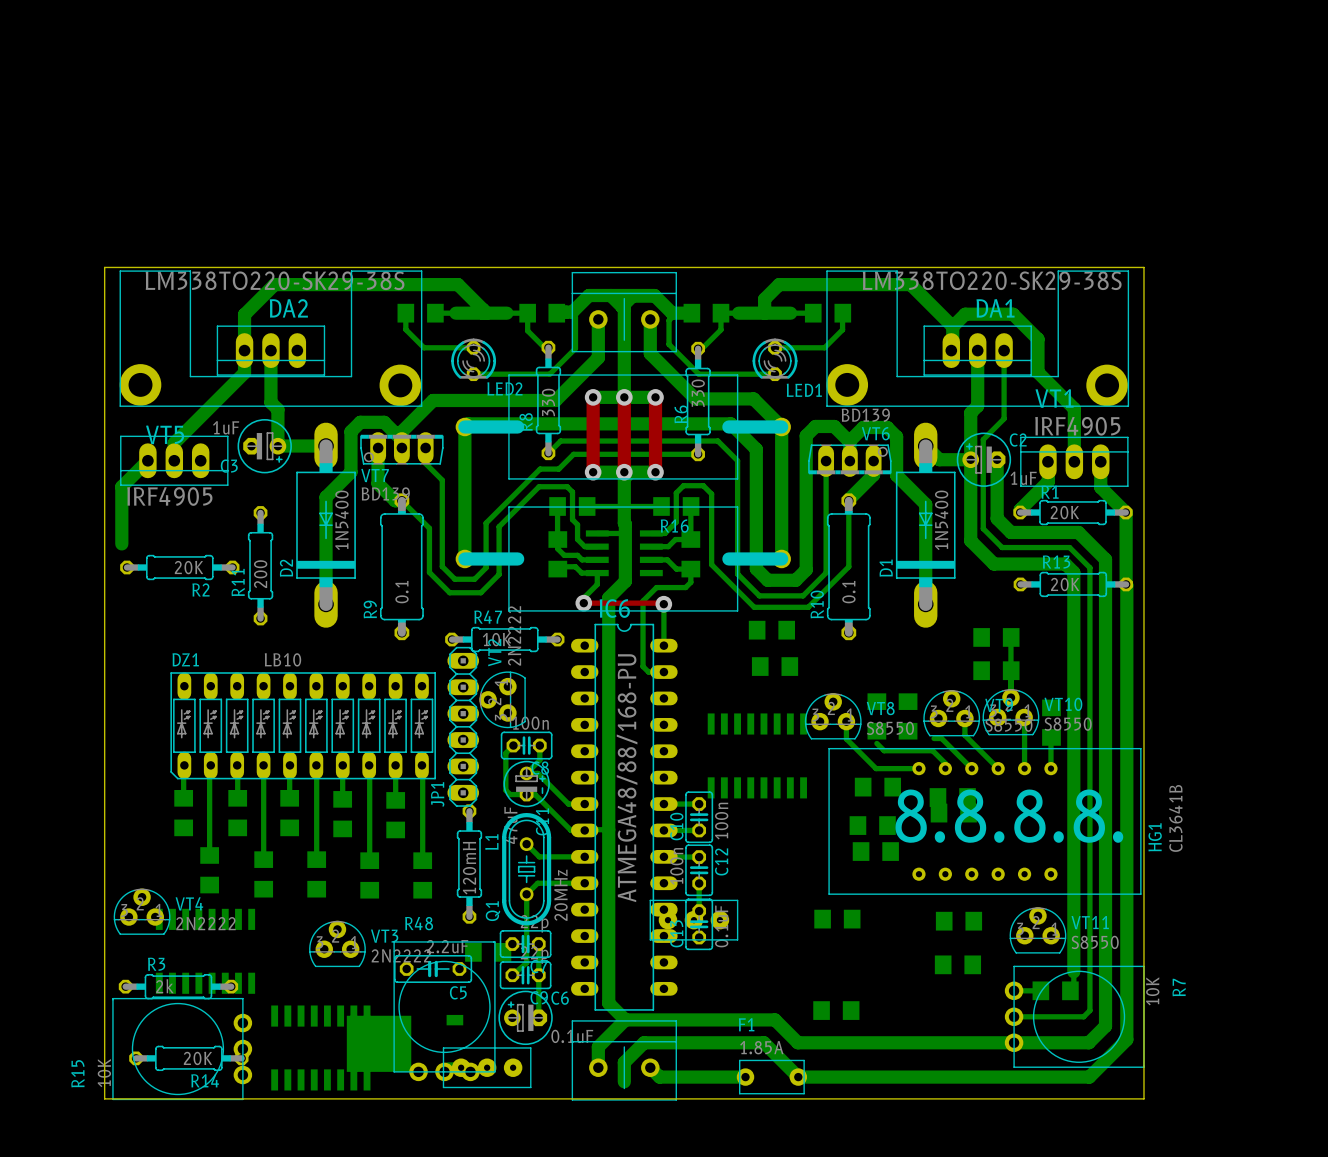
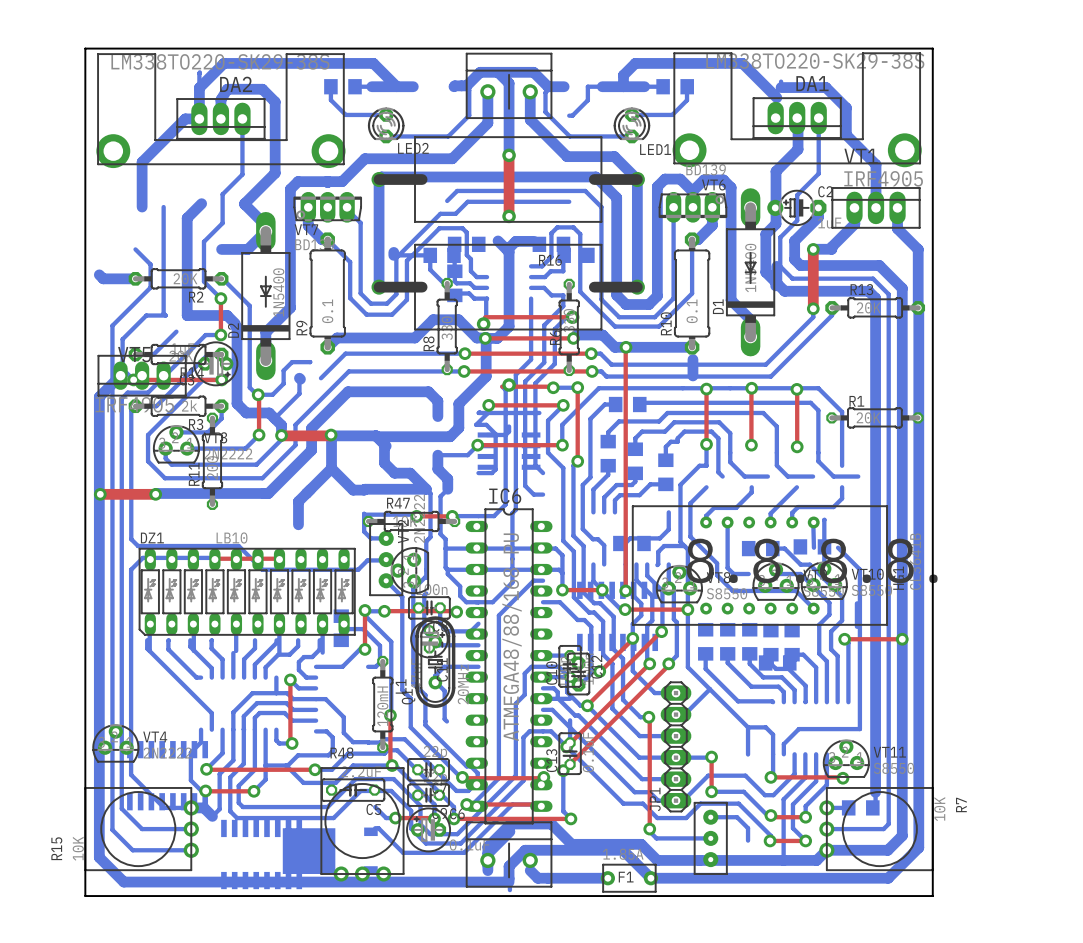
bottom track: none -> (199, 72) (199, 87)
bottom track: none -> (498, 72) (509, 83) (509, 155)
bottom track: none -> (781, 81) (781, 87) (826, 87) (846, 107) (846, 135) (876, 164) (876, 207)
part: none -> (509, 85)
part: none -> (342, 86)
bottom track: none -> (396, 86) (373, 63) (223, 63) (199, 87)
bottom track: none -> (623, 86) (623, 75) (635, 63) (742, 63) (776, 97)
part: none -> (675, 86)
bottom track: none -> (199, 87) (199, 118) (185, 118) (142, 162) (142, 207)
bottom track: none -> (487, 91) (487, 123) (452, 158) (365, 158) (342, 181) (298, 181) (290, 189) (290, 307) (265, 332) (265, 360)
bottom track: none -> (220, 118) (220, 99) (227, 89) (262, 89) (275, 101) (275, 173) (244, 203) (265, 225) (265, 231) (247, 249) (221, 249)
bottom track: none -> (242, 118) (242, 174) (222, 194) (222, 223) (203, 241) (203, 281) (220, 298)
via: none -> (509, 155)
bottom track: none -> (569, 201) (467, 201) (455, 213) (440, 213) (396, 257) (396, 294) (387, 303) (370, 303) (360, 293) (360, 222) (347, 207)
bottom track: none -> (201, 203) (187, 218) (187, 315) (227, 315) (235, 323) (237, 327) (237, 403) (246, 412) (269, 412) (281, 425) (281, 435)
bottom track: none -> (163, 207) (163, 313) (165, 315) (146, 315) (122, 339) (122, 368) (133, 379)
bottom track: none -> (308, 207) (308, 225) (322, 239) (327, 239) (350, 262) (350, 298) (366, 314) (392, 314) (406, 299) (406, 260) (439, 228) (462, 228) (466, 232) (466, 255) (470, 259) (470, 271) (476, 277) (487, 277)
bottom track: none -> (712, 207) (712, 225) (698, 239) (692, 239) (692, 293) (659, 326) (614, 326) (580, 291) (580, 234) (573, 227) (557, 227) (551, 233) (551, 257) (542, 266) (531, 266)
bottom track: none -> (854, 208) (854, 224) (831, 246) (831, 249) (813, 249)
via: none -> (509, 216)
board edge: (104, 267) (1143, 267) -> (85, 218) (85, 48) (932, 48) (932, 218)
DA2 footprint: [119, 270, 423, 407] -> [96, 53, 346, 169]
DA1 footprint: [826, 270, 1130, 407] -> [672, 52, 922, 168]
bottom track: none -> (454, 244) (454, 281) (456, 283) (470, 283) (474, 287) (487, 287)
part: none -> (466, 244)
part: none -> (551, 244)
bottom track: none -> (135, 249) (150, 264) (150, 287) (112, 325) (112, 829) (132, 850) (191, 850)
top track: none -> (813, 249) (813, 308)
via: none -> (813, 249)
bottom track: (566, 312) (570, 312) (575, 317) (575, 348) (549, 374) (473, 374) -> (461, 85) (464, 85) (469, 90) (469, 115) (448, 136) (386, 136)
part: (624, 312) -> none
bottom track: (405, 313) (405, 329) (424, 347) (473, 347) -> (330, 86) (330, 100) (345, 114) (386, 114)
part: (420, 313) -> none
bottom track: (435, 313) (506, 313) -> (355, 86) (413, 86)
bottom track: (486, 313) (458, 284) (274, 284) (244, 314) (244, 372) (174, 443) (174, 460) -> none
bottom track: (556, 313) (572, 312) (588, 295) (654, 295) (672, 313) (691, 313) (676, 313) (669, 320) (669, 344) (698, 374) (775, 374) -> (453, 86) (466, 85) (480, 72) (533, 72) (548, 86) (564, 86) (551, 86) (545, 92) (545, 112) (569, 136) (631, 136)
bottom track: (764, 313) (764, 299) (779, 284) (910, 284) (952, 326) (965, 314) (1013, 314) (1037, 339) (1037, 372) (1074, 408) (1074, 461) -> none
bottom track: (813, 313) (720, 313) (720, 329) (702, 348) (698, 348) -> (663, 86) (587, 86) (587, 100) (572, 115) (569, 115)
part: (828, 313) -> none
bottom track: (842, 313) (842, 329) (824, 347) (774, 347) -> (687, 86) (687, 100) (672, 114) (631, 114)
bottom track: (598, 319) (598, 357) (555, 400) (433, 400) (401, 431) (401, 447) -> none
bottom track: (650, 319) (650, 353) (695, 398) (753, 398) (781, 426) (781, 558) -> (530, 91) (530, 119) (567, 156) (614, 156) (637, 179) (637, 287)
bottom track: none -> (99, 274) (103, 278) (135, 278)
LED2 footprint: [451, 338, 497, 382] -> [367, 107, 405, 144]
LED1 footprint: [752, 338, 798, 382] -> [613, 107, 651, 144]
bottom track: none -> (221, 278) (249, 305) (249, 387) (256, 394) (272, 394) (283, 383) (283, 370) (292, 362) (310, 362)
part: none -> (454, 283)
bottom track: (270, 350) (270, 402) (277, 409) (277, 446) (326, 446) -> none
bottom track: (977, 350) (977, 405) (970, 412) (970, 540) (993, 564) (1065, 564) (1073, 572) -> (797, 118) (798, 149) (776, 171) (776, 224) (765, 234) (765, 272) (784, 291) (868, 291) (875, 298) (875, 466)
bottom track: (1004, 350) (1004, 418) (983, 439) (983, 528) (1002, 547) (1069, 547) (1089, 567) -> (818, 118) (818, 173) (797, 195) (797, 220) (780, 237) (780, 266) (792, 278) (873, 278) (888, 294) (888, 462)
bottom track: none -> (379, 287) (379, 179) (381, 176) (595, 176) (616, 197) (616, 295) (626, 304) (648, 304) (657, 296) (657, 186) (664, 179) (680, 179) (692, 190) (703, 179) (723, 179) (731, 187) (731, 300) (750, 319) (750, 336)
bottom track: none -> (531, 287) (544, 287) (551, 295) (563, 295) (563, 306) (544, 325) (544, 362) (525, 381) (525, 485) (533, 494) (543, 494)
bottom track: none -> (454, 295) (455, 293) (469, 293) (474, 298) (487, 298) (485, 317)
top track: none -> (220, 298) (220, 335)
via: none -> (220, 298)
bottom track: none -> (531, 298) (531, 359) (515, 374) (515, 509) (512, 513) (512, 569)
bottom track: none -> (832, 307) (832, 315) (770, 376) (606, 376) (601, 371) (592, 371)
bottom track: none -> (813, 308) (813, 317) (765, 364) (611, 364) (600, 353) (591, 353)
via: none -> (813, 308)
top track: none -> (485, 317) (572, 317)
bottom track: none -> (572, 317) (566, 317) (554, 329) (554, 363) (535, 383) (535, 465) (543, 473)
via: none -> (572, 317)
bottom track: (593, 397) (655, 397) -> none
top track: (593, 397) (593, 472) -> none
bottom track: none -> (509, 324) (509, 326) (497, 338) (485, 338) (486, 376) (458, 403) (458, 428) (450, 436) (376, 436)
top track: (624, 397) (624, 472) -> (509, 155) (509, 216)
via: (624, 397) -> none
top track: (655, 397) (655, 472) -> none
via: (655, 397) -> none
bottom track: none -> (176, 331) (153, 354) (135, 354)
bottom track: none -> (220, 335) (205, 335) (148, 392) (127, 392) (121, 398) (121, 808) (142, 829) (191, 829)
via: none -> (220, 335)
top track: none -> (485, 338) (573, 338)
via: none -> (485, 338)
bottom track: none -> (573, 338) (576, 335) (602, 335) (614, 347) (692, 347)
via: none -> (573, 338)
bottom track: none -> (486, 339) (476, 337) (458, 319) (433, 319) (414, 337) (337, 337) (327, 347)
D2 footprint: [296, 422, 356, 628] -> [241, 211, 291, 381]
D1 footprint: [895, 422, 956, 628] -> [726, 188, 775, 357]
top track: none -> (626, 347) (625, 590)
via: none -> (626, 347)
bottom track: none -> (221, 350) (221, 354) (208, 354) (156, 406) (135, 406) (131, 410) (131, 539) (138, 546) (238, 546) (262, 569) (358, 569) (367, 560) (386, 559)
VT7 footprint: [360, 432, 444, 465] -> [293, 191, 362, 223]
C2 footprint: [956, 432, 1012, 487] -> [767, 190, 827, 226]
bottom track: none -> (464, 353) (345, 353) (320, 378)
top track: none -> (464, 353) (591, 353)
via: none -> (464, 353)
via: none -> (591, 353)
VT1 footprint: [1020, 436, 1129, 487] -> [831, 187, 921, 229]
bottom track: (401, 439) (384, 422) (360, 422) (350, 431) (350, 472) (326, 497) (326, 604) -> none
VT6 footprint: [808, 444, 892, 477] -> [658, 191, 727, 223]
bottom track: (925, 446) (939, 459) (970, 459) -> none
bottom track: (425, 447) (425, 463) (442, 480) (442, 566) (454, 579) (474, 579) (486, 567) (486, 523) (540, 469) (558, 469) (573, 454) (698, 454) -> none
bottom track: (378, 448) (378, 483) (395, 500) (401, 500) (429, 528) (429, 572) (449, 592) (480, 592) (499, 574) (499, 526) (539, 486) (567, 486) (572, 492) (572, 519) (577, 524) (577, 539) (584, 546) (597, 546) -> none
bottom track: (548, 453) (560, 441) (717, 441) (737, 460) (737, 574) (759, 595) (803, 595) (826, 572) (826, 461) -> (447, 200) (457, 190) (585, 190) (601, 207) (601, 299) (619, 317) (654, 317) (673, 298) (673, 207)
bottom track: none -> (464, 371) (348, 371) (295, 424) (295, 445) (262, 478) (165, 478) (148, 461) (148, 435) (203, 379) (221, 379)
top track: none -> (464, 371) (592, 371)
via: none -> (464, 371)
via: none -> (592, 371)
bottom track: (997, 459) (997, 518) (1010, 532) (1078, 532) (1105, 559) (1105, 1026) -> (818, 207) (818, 217) (794, 240) (794, 259) (800, 265) (879, 265) (902, 288) (901, 836)
bottom track: (873, 461) (873, 474) (848, 499) (848, 566) (808, 607) (784, 607) -> (665, 484) (650, 484) (639, 495)
bottom track: (1047, 462) (1048, 481) (1020, 509) (1020, 512) -> none
bottom track: (1100, 462) (1100, 487) (1126, 512) (1126, 585) -> (897, 208) (897, 228) (918, 249) (918, 477)
top track: none -> (133, 379) (221, 379)
via: none -> (133, 379)
via: none -> (221, 379)
bottom track: none -> (300, 379) (299, 393) (274, 418)
bottom track: (593, 472) (655, 472) -> none
via: (593, 472) -> none
via: (655, 472) -> none
bottom track: none -> (502, 386) (505, 390) (505, 504) (494, 516) (452, 516)
top track: none -> (502, 386) (553, 387)
bottom track: (627, 475) (624, 472) (625, 581) (608, 597) (608, 1003) (625, 1019) (775, 1019) (797, 1042) (1014, 1042) -> (487, 853) (487, 846) (510, 824) (551, 824) (571, 844) (641, 844) (657, 860) (816, 860) (826, 850)
via: none -> (553, 387)
bottom track: none -> (577, 387) (553, 387)
top track: none -> (577, 387) (577, 461)
via: none -> (577, 387)
top track: none -> (751, 388) (751, 445)
via: none -> (751, 388)
top track: none -> (706, 389) (706, 444)
via: none -> (706, 389)
top track: none -> (796, 389) (797, 446)
via: none -> (796, 389)
top track: none -> (258, 394) (259, 435)
via: none -> (258, 394)
R16 position: (623, 492) -> (508, 233)
R9 footprint: [380, 493, 424, 641] -> [309, 232, 346, 355]
R10 footprint: [826, 493, 871, 641] -> [674, 232, 710, 355]
bottom track: none -> (615, 404) (604, 404) (590, 418) (590, 477) (582, 485) (582, 529) (592, 539) (598, 539) (604, 545) (604, 564)
part: none -> (627, 404)
bottom track: none -> (639, 404) (641, 402) (810, 402) (818, 410) (818, 461) (833, 476) (858, 476)
bottom track: none -> (488, 405) (488, 412) (476, 424) (486, 424) (495, 434) (495, 469) (492, 473) (478, 473)
top track: none -> (488, 405) (563, 405)
via: none -> (488, 405)
via: none -> (563, 405)
bottom track: none -> (221, 406) (221, 418) (207, 432) (176, 432)
bottom track: (557, 506) (557, 548) (564, 555) (577, 555) (582, 559) (597, 559) -> none
part: (572, 506) -> none
part: (676, 506) -> none
bottom track: (691, 506) (690, 539) (675, 539) (668, 546) (651, 546) -> (563, 244) (563, 271) (550, 271) (544, 277) (531, 277)
bottom track: none -> (437, 416) (437, 401) (428, 391) (348, 391) (311, 428) (311, 450) (268, 493) (155, 494)
bottom track: none -> (259, 435) (245, 448) (187, 448)
via: none -> (259, 435)
bottom track: none -> (331, 435) (376, 435) (386, 446)
top track: none -> (331, 435) (281, 435)
via: none -> (331, 435)
bottom track: (651, 533) (664, 533) (676, 522) (676, 492) (683, 485) (703, 485) (711, 494) (711, 564) (754, 607) (760, 607) -> (614, 512) (614, 500) (620, 495)
bottom track: none -> (281, 435) (281, 439) (256, 464) (171, 464) (165, 458) (165, 448)
via: none -> (281, 435)
bottom track: none -> (331, 435) (331, 468)
bottom track: none -> (608, 441) (608, 432) (619, 421) (659, 421) (667, 412) (763, 412) (776, 426) (776, 465) (787, 476) (813, 476)
bottom track: none -> (99, 443) (99, 857) (123, 882) (505, 882) (509, 886) (509, 890)
bottom track: none -> (384, 444) (384, 462) (394, 473) (410, 473) (426, 489)
bottom track: none -> (706, 444) (706, 465) (699, 465) (680, 484) (680, 542) (687, 549) (687, 667) (748, 727)
via: none -> (706, 444)
bottom track: none -> (477, 445) (467, 455) (437, 455) (437, 469) (447, 479) (447, 489) (440, 496) (440, 534) (445, 539) (445, 567) (447, 569)
top track: none -> (477, 445) (562, 445)
via: none -> (477, 445)
bottom track: none -> (562, 445) (562, 424) (598, 388) (818, 388) (842, 411) (842, 465)
via: none -> (562, 445)
via: none -> (751, 445)
via: none -> (797, 446)
bottom track: none -> (635, 449) (635, 438) (642, 431) (664, 431) (674, 422) (719, 422) (730, 433) (730, 462) (744, 476) (767, 476)
R2 footprint: [120, 554, 240, 581] -> [128, 268, 229, 290]
part: (557, 554) -> none
part: (690, 554) -> none
part: none -> (608, 453)
bottom track: (464, 558) (464, 426) (468, 423) (730, 423) (756, 449) (756, 568) (767, 580) (795, 580) (806, 569) (806, 435) (815, 426) (834, 426) (849, 441) (863, 427) (887, 427) (896, 436) (896, 475) (925, 504) (925, 604) -> none
bottom track: (651, 559) (667, 559) (676, 569) (690, 569) (690, 574) -> (563, 405) (548, 420) (548, 452) (563, 468)
bottom track: none -> (665, 460) (665, 446) (670, 441) (677, 441) (677, 438) (684, 431) (711, 431) (718, 438) (718, 472) (722, 476)
bottom track: none -> (577, 461) (573, 465) (573, 535) (583, 546) (583, 592) (594, 603) (600, 603) (613, 616) (613, 649) (623, 658) (623, 699) (640, 717) (648, 717)
via: none -> (577, 461)
part: none -> (635, 461)
bottom track: (557, 569) (558, 566) (575, 566) (581, 573) (597, 573) (597, 584) (583, 598) (583, 603) -> none
bottom track: none -> (608, 465) (608, 474) (593, 489) (593, 512)
R13 footprint: [1013, 571, 1133, 598] -> [825, 297, 926, 319]
bottom track: none -> (331, 468) (298, 501) (298, 524)
bottom track: none -> (331, 468) (353, 490) (426, 489)
part: none -> (665, 472)
bottom track: none -> (635, 473) (635, 481) (631, 485) (616, 485) (604, 497) (604, 512)
bottom track: (690, 582) (685, 587) (656, 587) (643, 601) (643, 666) (648, 672) (663, 672) -> (563, 474) (563, 540) (573, 551) (573, 597) (589, 612) (594, 612) (603, 621) (603, 654) (612, 663) (612, 708) (639, 736) (676, 736)
bottom track: none -> (706, 487) (690, 503) (690, 536) (717, 563) (717, 575) (732, 590) (796, 590) (813, 608)
bottom track: none -> (751, 487) (751, 492) (736, 507) (714, 507) (706, 515) (706, 522)
bottom track: none -> (796, 487) (770, 513) (770, 522)
bottom track: none -> (842, 487) (842, 498) (833, 507) (798, 507) (792, 512) (792, 522)
bottom track: none -> (426, 489) (430, 493) (430, 537) (426, 541) (426, 577) (413, 589) (413, 683) (425, 695) (425, 725) (466, 766) (470, 766) (477, 773) (477, 781) (468, 790) (456, 790) (404, 739) (383, 739) (380, 742) (353, 742) (343, 732) (343, 717) (325, 699) (293, 699) (287, 693) (252, 693) (233, 712) (233, 760) (219, 774) (219, 809) (212, 816) (203, 807) (164, 807) (131, 774) (131, 569) (142, 557) (211, 557)
top track: (583, 603) (663, 604) -> none
via: (583, 603) -> none
bottom track: (663, 604) (663, 645) -> none
via: (663, 604) -> none
top track: none -> (100, 494) (155, 494)
via: none -> (100, 494)
via: none -> (155, 494)
bottom track: none -> (668, 512) (668, 529) (659, 538) (630, 538) (625, 542) (625, 590) (628, 590) (641, 603) (641, 615) (632, 624) (632, 671) (654, 693) (676, 693)
part: (771, 630) -> none
bottom track: none -> (416, 516) (414, 514) (364, 513) (364, 531) (370, 538) (386, 538)
top track: none -> (416, 516) (452, 516)
via: none -> (416, 516)
via: none -> (452, 516)
part: (996, 637) -> none
bottom track: none -> (727, 522) (727, 567) (733, 574) (748, 574)
bottom track: none -> (813, 522) (813, 547)
JP1 footprint: [447, 646, 480, 807] -> [660, 681, 692, 813]
bottom track: none -> (684, 546) (664, 546) (658, 551) (657, 565)
bottom track: none -> (838, 547) (859, 569) (859, 729) (798, 729) (783, 744) (783, 754)
bottom track: none -> (445, 548) (555, 548) (562, 555) (562, 590)
part: none -> (760, 548)
bottom track: none -> (772, 548) (784, 548) (800, 564) (809, 564) (842, 596) (842, 620) (831, 631) (831, 649) (837, 655) (837, 702)
top track: none -> (211, 557) (275, 558)
part: none -> (386, 559)
bottom track: none -> (593, 564) (593, 581) (620, 609) (625, 609)
bottom track: none -> (636, 564) (636, 580) (652, 596) (652, 620) (647, 625) (647, 661) (649, 663)
bottom track: none -> (647, 564) (647, 575) (662, 590) (661, 631)
bottom track: none -> (668, 564) (668, 582) (673, 587) (673, 619) (676, 622) (676, 655) (668, 663)
bottom track: none -> (447, 569) (559, 569) (562, 573)
bottom track: none -> (447, 569) (447, 574) (460, 586) (460, 595) (466, 602) (492, 602) (512, 582) (512, 570)
bottom track: none -> (772, 574) (800, 574) (829, 602) (829, 614) (819, 624) (819, 653) (826, 661) (826, 702)
bottom track: none -> (386, 580) (402, 596) (402, 690) (410, 698) (410, 727) (462, 777)
bottom track: none -> (543, 580) (533, 580) (498, 615) (498, 778) (472, 804) (466, 804)
part: (876, 716) -> none
part: (908, 716) -> none
bottom track: (1024, 717) (1024, 768) -> none
bottom track: (964, 718) (964, 735) (998, 768) -> none
bottom track: (846, 721) (846, 738) (876, 768) (918, 768) -> none
part: (1051, 722) -> none
top track: none -> (562, 590) (602, 590)
via: none -> (562, 590)
via: none -> (602, 590)
via: none -> (625, 590)
bottom track: none -> (426, 593) (424, 595) (424, 630) (438, 645) (478, 645)
bottom track: none -> (543, 602) (559, 602) (577, 620) (584, 620) (591, 626) (591, 673) (578, 684)
bottom track: (934, 738) (941, 738) (971, 768) -> none
bottom track: (876, 743) (884, 750) (932, 750) (945, 763) (945, 768) -> none
bottom track: (513, 745) (505, 753) (505, 790) (510, 794) (535, 794) (571, 830) (608, 829) -> none
top track: none -> (625, 609) (687, 609)
via: none -> (625, 609)
via: none -> (687, 609)
top track: none -> (365, 610) (365, 649)
via: none -> (365, 610)
HG1 footprint: [828, 748, 1142, 895] -> [632, 505, 888, 626]
bottom track: none -> (384, 611) (365, 610) (365, 615) (391, 641) (390, 715)
top track: none -> (384, 611) (456, 611)
via: none -> (384, 611)
via: none -> (456, 611)
bottom track: (539, 760) (526, 773) (537, 773) (568, 804) (584, 804) -> (440, 619) (440, 623) (447, 631) (470, 631) (478, 623)
bottom track: (210, 765) (209, 855) -> none
bottom track: (263, 765) (263, 859) -> none
bottom track: (316, 765) (316, 859) -> none
bottom track: (369, 765) (369, 860) -> none
bottom track: (421, 765) (422, 860) -> none
part: none -> (341, 628)
top track: none -> (661, 631) (587, 705)
via: none -> (661, 631)
top track: none -> (632, 638) (599, 671)
via: none -> (632, 638)
bottom track: none -> (844, 639) (848, 643) (848, 702)
top track: none -> (844, 639) (902, 639)
via: none -> (844, 639)
via: none -> (902, 639)
bottom track: none -> (147, 640) (147, 648) (211, 713) (211, 729)
bottom track: none -> (168, 640) (168, 649) (196, 677) (201, 677)
bottom track: none -> (190, 640) (190, 646) (211, 668) (211, 677)
bottom track: none -> (211, 640) (211, 648) (222, 659) (222, 677)
bottom track: none -> (255, 640) (255, 648) (244, 659) (244, 677)
bottom track: none -> (276, 640) (276, 642) (254, 664) (254, 677)
bottom track: none -> (298, 640) (298, 646) (289, 654) (278, 654) (265, 667) (265, 677)
bottom track: none -> (319, 640) (319, 649) (312, 657) (303, 657) (298, 662) (298, 669) (306, 677) (316, 677)
bottom track: none -> (341, 640) (341, 632) (344, 629) (363, 629) (380, 645) (380, 662) (375, 666) (368, 666)
part: none -> (705, 641)
part: (877, 787) -> none
part: none -> (727, 641)
part: none -> (749, 641)
part: none -> (770, 642)
part: none -> (792, 642)
bottom track: none -> (365, 649) (359, 649) (342, 666) (316, 666)
via: none -> (365, 649)
part: (952, 797) -> none
bottom track: none -> (233, 653) (233, 677)
bottom track: none -> (705, 653) (705, 668) (738, 701) (773, 702)
bottom track: none -> (727, 653) (727, 662) (751, 686) (778, 686) (783, 692) (783, 702)
bottom track: none -> (749, 653) (749, 663) (763, 677) (781, 677) (794, 690) (794, 702)
bottom track: none -> (770, 654) (771, 664) (776, 668) (788, 668) (805, 685) (805, 702)
bottom track: none -> (792, 654) (803, 654) (816, 667) (816, 702)
Q1 footprint: [502, 812, 552, 926] -> [415, 616, 456, 708]
part: (183, 813) -> none
part: (237, 813) -> none
part: (289, 813) -> none
part: (342, 814) -> none
top track: none -> (649, 663) (566, 746)
via: none -> (649, 663)
top track: none -> (668, 663) (563, 770)
via: none -> (668, 663)
part: (395, 815) -> none
bottom track: none -> (478, 666) (444, 666) (435, 675) (435, 682) (444, 690) (444, 719) (446, 721)
via: none -> (599, 671)
part: (872, 825) -> none
bottom track: none -> (276, 677) (276, 693)
bottom track: none -> (290, 679) (298, 688) (316, 688)
top track: none -> (290, 679) (290, 741) (292, 743)
via: none -> (290, 679)
bottom track: (526, 844) (539, 856) (584, 856) -> none
bottom track: none -> (543, 688) (553, 688) (557, 692) (557, 698) (575, 715) (578, 715) (642, 779) (676, 779)
C12 footprint: [685, 844, 714, 897] -> [567, 652, 590, 696]
bottom track: none -> (709, 689) (684, 714) (676, 714)
part: (875, 851) -> none
via: none -> (587, 705)
part: (209, 870) -> none
bottom track: none -> (316, 709) (293, 709) (286, 703) (257, 703) (243, 716) (243, 763) (230, 777) (230, 811) (237, 818) (333, 818) (360, 790) (391, 790) (411, 810) (411, 828) (426, 843) (460, 843) (523, 780) (523, 737) (529, 731) (551, 731) (623, 803) (642, 803) (657, 818) (686, 818) (700, 803) (738, 803) (770, 835) (770, 840)
bottom track: none -> (543, 709) (552, 709) (634, 792) (649, 792) (658, 800) (683, 800) (708, 775) (745, 775) (764, 795) (773, 795) (794, 774) (794, 754)
part: (263, 874) -> none
part: (316, 874) -> none
part: (369, 875) -> none
part: (422, 875) -> none
top track: none -> (390, 715) (390, 763) (392, 765)
via: none -> (390, 715)
top track: none -> (648, 717) (649, 829)
via: none -> (648, 717)
bottom track: none -> (316, 720) (292, 720) (284, 713) (259, 713) (254, 717) (254, 769) (238, 785) (238, 802) (242, 807) (327, 807) (355, 779) (393, 779) (420, 805) (420, 824) (430, 834) (457, 834) (515, 775) (515, 703) (524, 694) (524, 673) (531, 666) (558, 666) (567, 675) (567, 692) (580, 705) (587, 705) (639, 757) (711, 757)
bottom track: (584, 883) (537, 883) (526, 894) -> none
bottom track: none -> (748, 727) (765, 727) (773, 734) (773, 775) (770, 777)
bottom track: none -> (748, 727) (748, 754)
bottom track: none -> (201, 729) (201, 742) (190, 752) (190, 780) (201, 790) (205, 790)
bottom track: none -> (222, 729) (222, 753) (206, 769)
bottom track: none -> (265, 729) (265, 779) (253, 791)
bottom track: none -> (276, 729) (276, 740) (279, 743) (292, 743)
bottom track: (526, 894) (526, 962) (512, 975) -> none
bottom track: none -> (316, 731) (326, 731) (332, 737) (332, 751) (328, 755) (298, 755) (287, 765) (265, 765)
via: none -> (292, 743)
via: none -> (566, 746)
part: (837, 919) -> none
part: (693, 920) -> none
part: (958, 921) -> none
bottom track: none -> (805, 754) (805, 777) (783, 799) (783, 860)
bottom track: none -> (816, 754) (816, 781) (792, 804) (792, 828) (805, 840)
bottom track: none -> (826, 754) (826, 784) (805, 806) (805, 817)
top track: none -> (711, 757) (711, 791)
via: none -> (711, 757)
bottom track: none -> (286, 765) (303, 782) (335, 782) (353, 765) (395, 765) (434, 804) (434, 818)
via: none -> (392, 765)
top track: none -> (206, 769) (315, 769)
via: none -> (206, 769)
VT3 position: (337, 943) -> (176, 444)
bottom track: none -> (315, 769) (331, 769) (348, 753) (384, 753) (387, 750) (397, 750) (453, 807) (453, 818)
via: none -> (315, 769)
bottom track: (538, 944) (538, 1017) -> none
bottom track: none -> (563, 770) (563, 811) (570, 818)
via: none -> (563, 770)
part: (488, 952) -> none
top track: none -> (462, 777) (543, 777)
via: none -> (462, 777)
via: none -> (543, 777)
top track: none -> (770, 777) (842, 778)
via: none -> (770, 777)
via: none -> (842, 778)
R3 name position: R3 (156, 964) -> R3 (196, 424)
part: (957, 964) -> none
top track: none -> (205, 790) (253, 791)
via: none -> (205, 790)
via: none -> (253, 791)
bottom track: none -> (711, 791) (743, 791) (767, 815) (770, 815)
via: none -> (711, 791)
R3 footprint: [118, 973, 239, 1000] -> [128, 395, 229, 417]
top track: none -> (466, 804) (543, 804)
via: none -> (466, 804)
bottom track: none -> (543, 804) (512, 804) (464, 852) (403, 852) (378, 828) (375, 828)
bottom track: none -> (375, 807) (386, 818) (395, 818)
R15 footprint: [112, 997, 253, 1101] -> [84, 787, 199, 871]
top track: none -> (770, 815) (772, 817) (805, 817)
via: none -> (770, 815)
bottom track: none -> (710, 817) (737, 817) (748, 828) (748, 840)
via: none -> (805, 817)
top track: none -> (395, 818) (434, 818)
via: none -> (395, 818)
via: none -> (434, 818)
top track: none -> (453, 818) (570, 818)
via: none -> (453, 818)
via: none -> (570, 818)
part: (836, 1010) -> none
bottom track: none -> (649, 829) (656, 838) (710, 838)
via: none -> (649, 829)
F1 name position: F1 (746, 1024) -> F1 (626, 877)
part: none -> (710, 838)
top track: none -> (770, 840) (805, 840)
via: none -> (770, 840)
via: none -> (805, 840)
R14 footprint: [129, 1045, 249, 1072] -> [128, 344, 229, 365]
part: none -> (509, 854)
part: (624, 1060) -> none
part: (487, 1067) -> none

